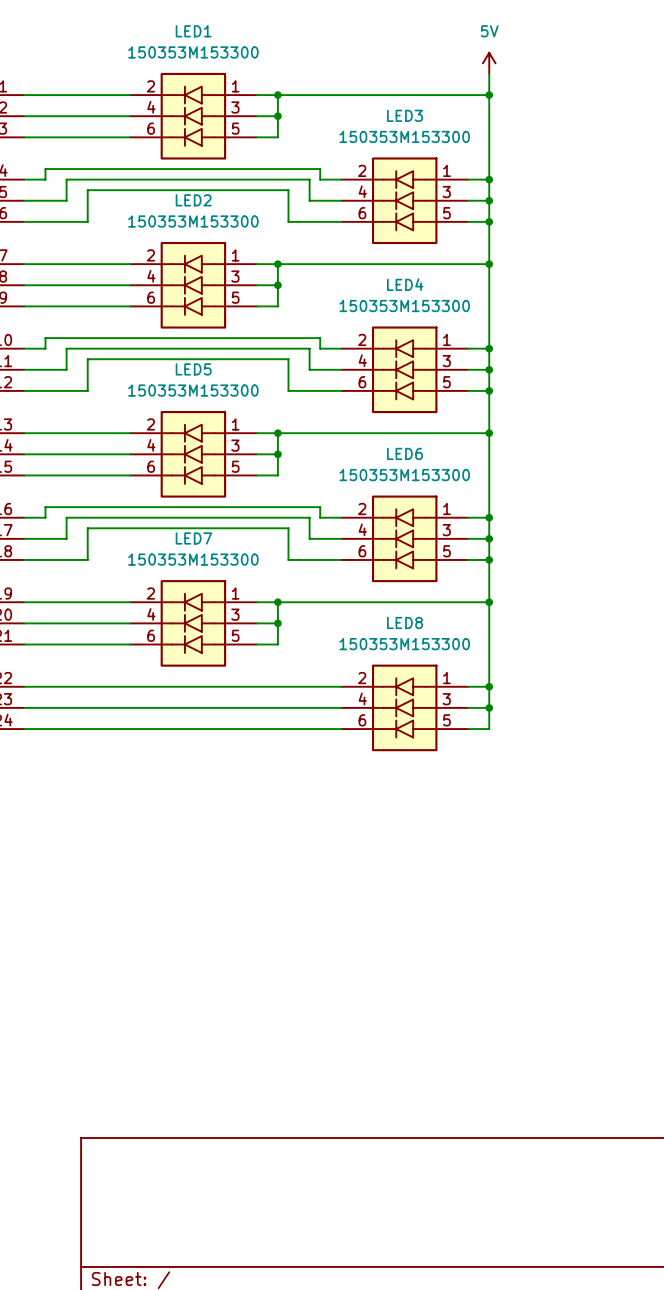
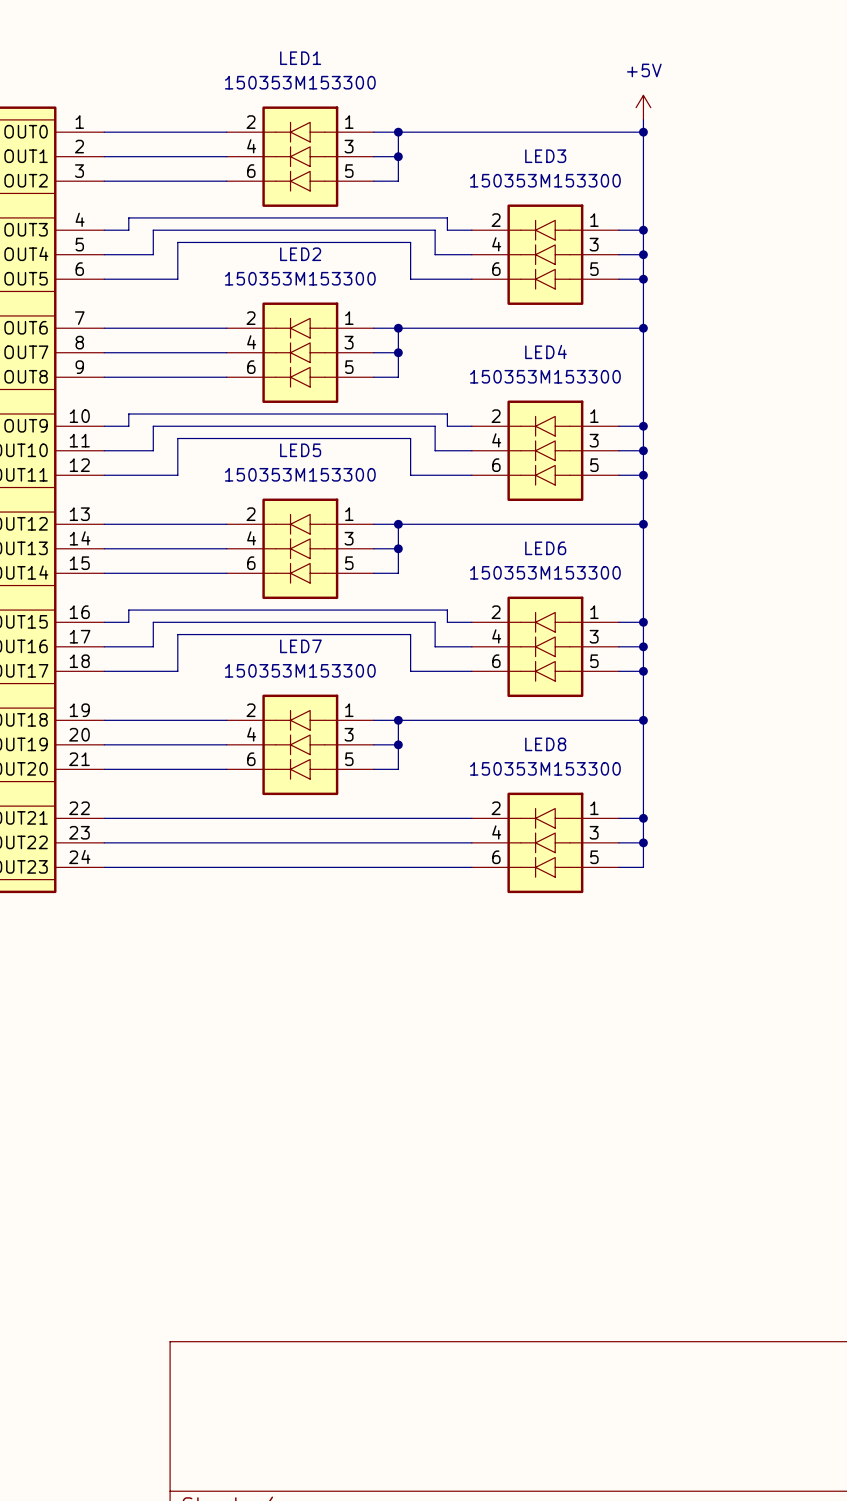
power symbol: 5V (489, 63) -> none
power symbol: none -> +5V (643, 107)

